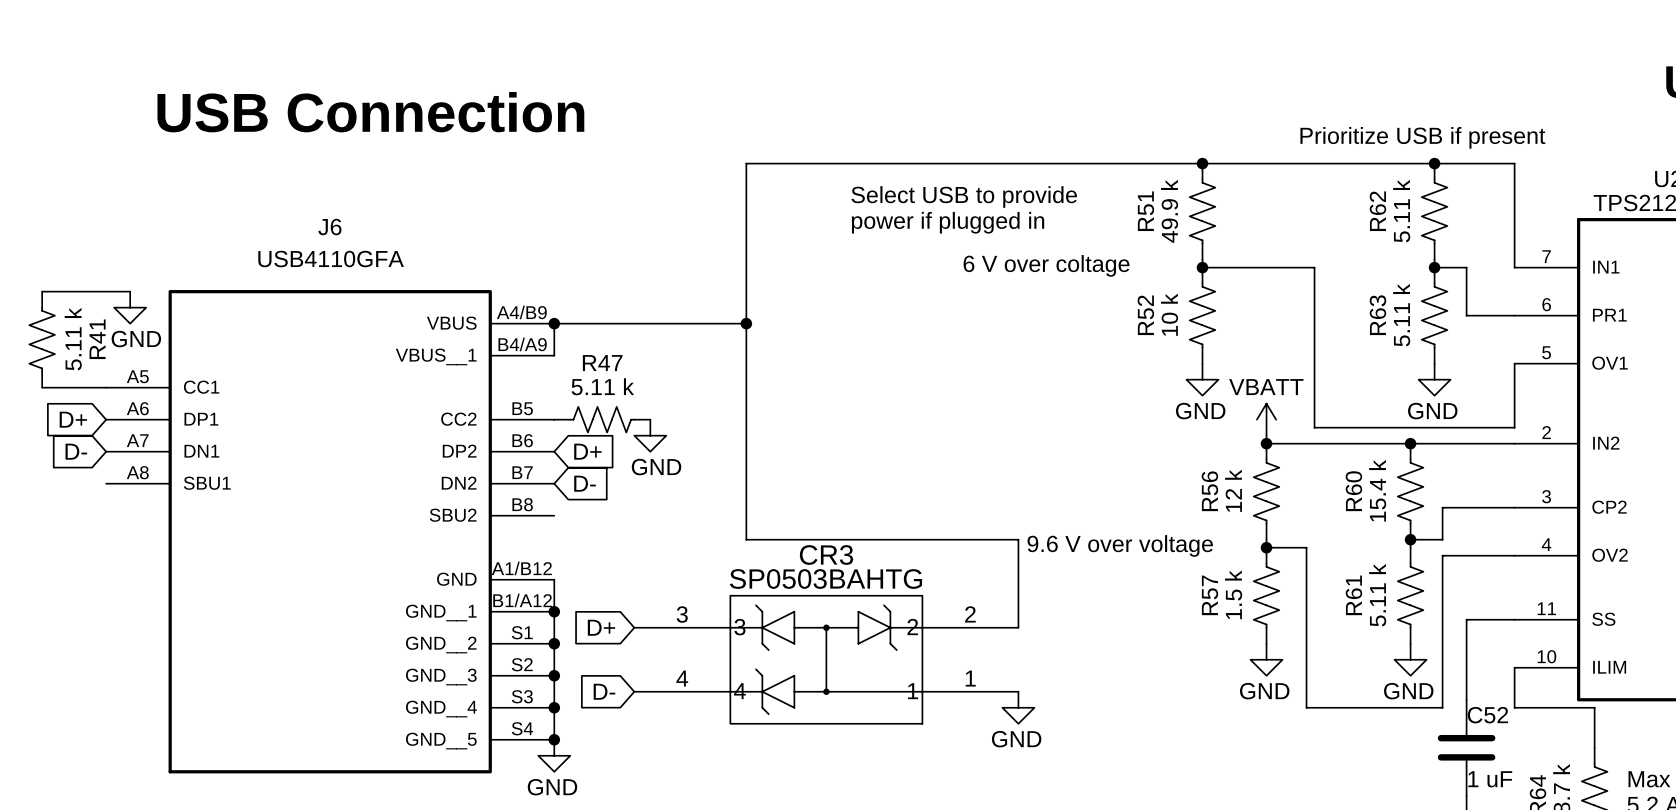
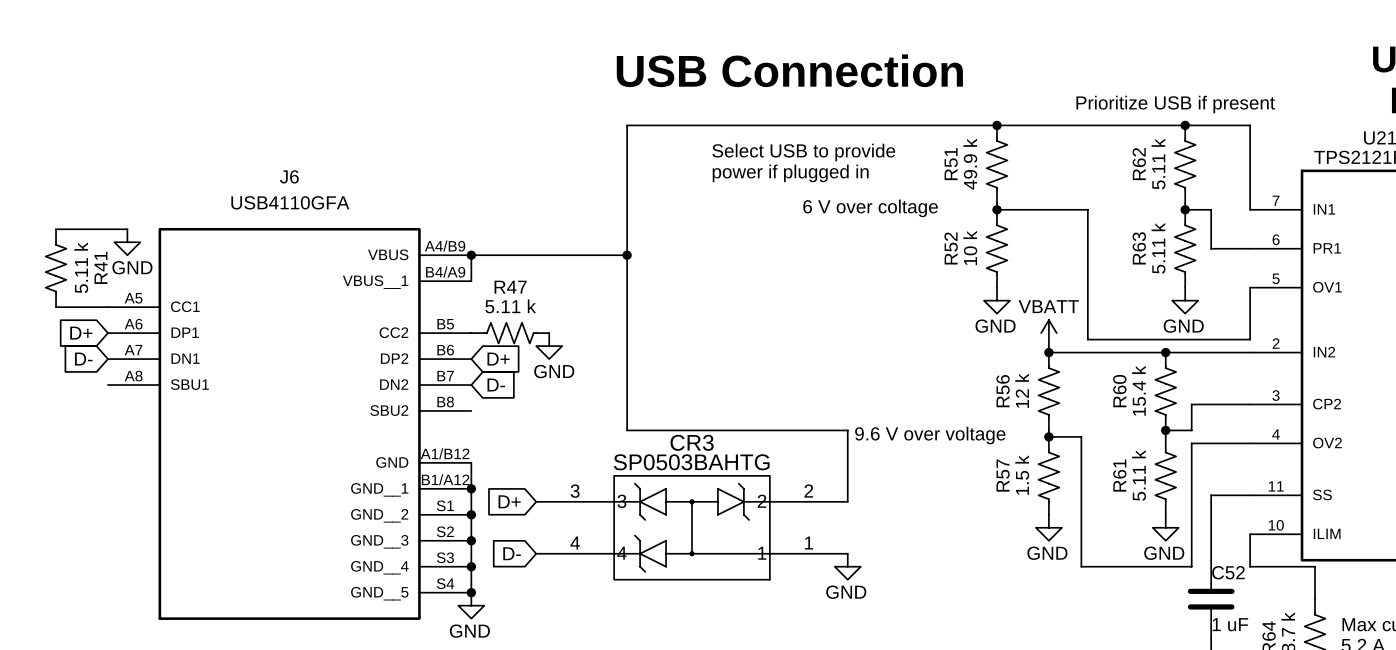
text: none -> USB Connection (789, 70)
text: USB Connection (370, 112) -> none

